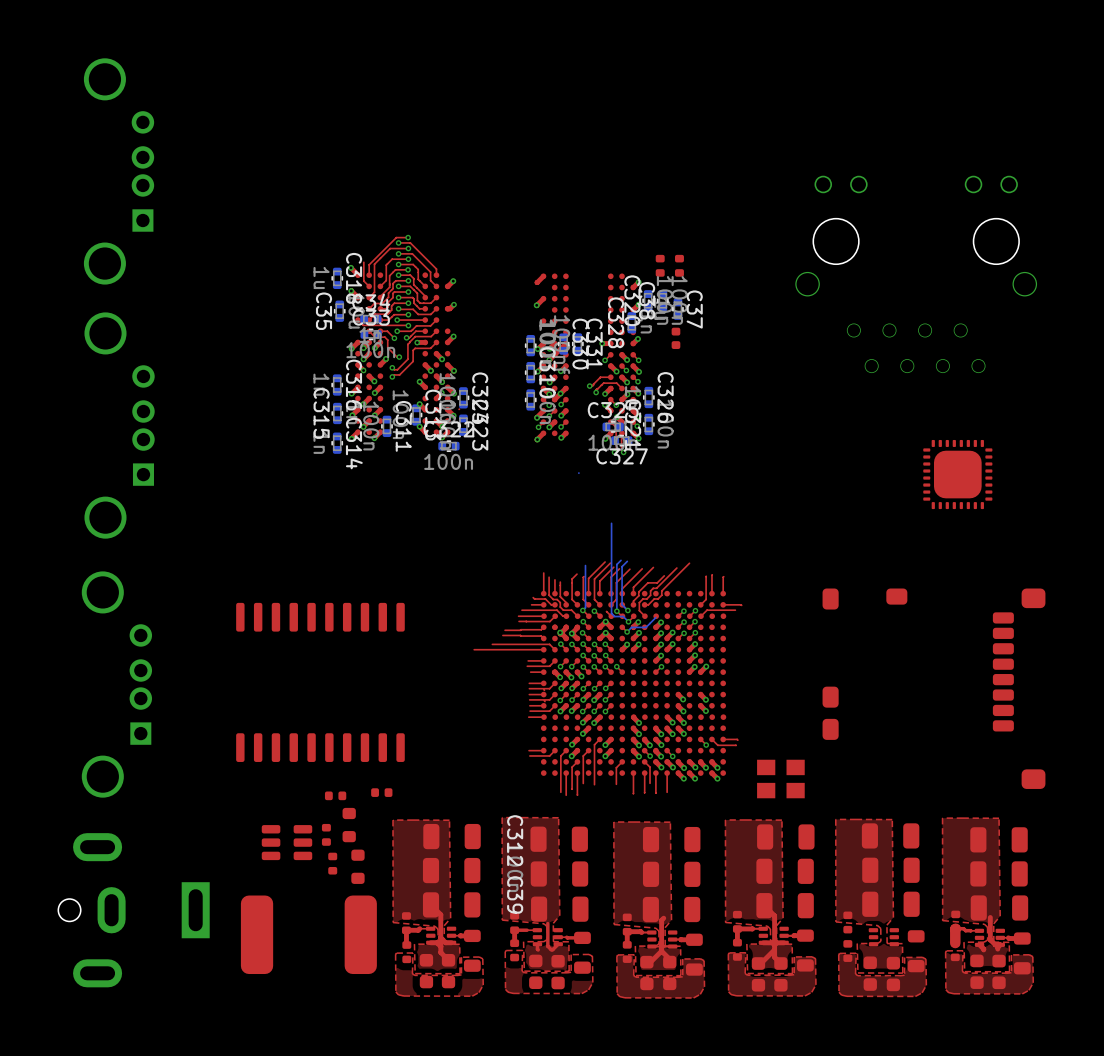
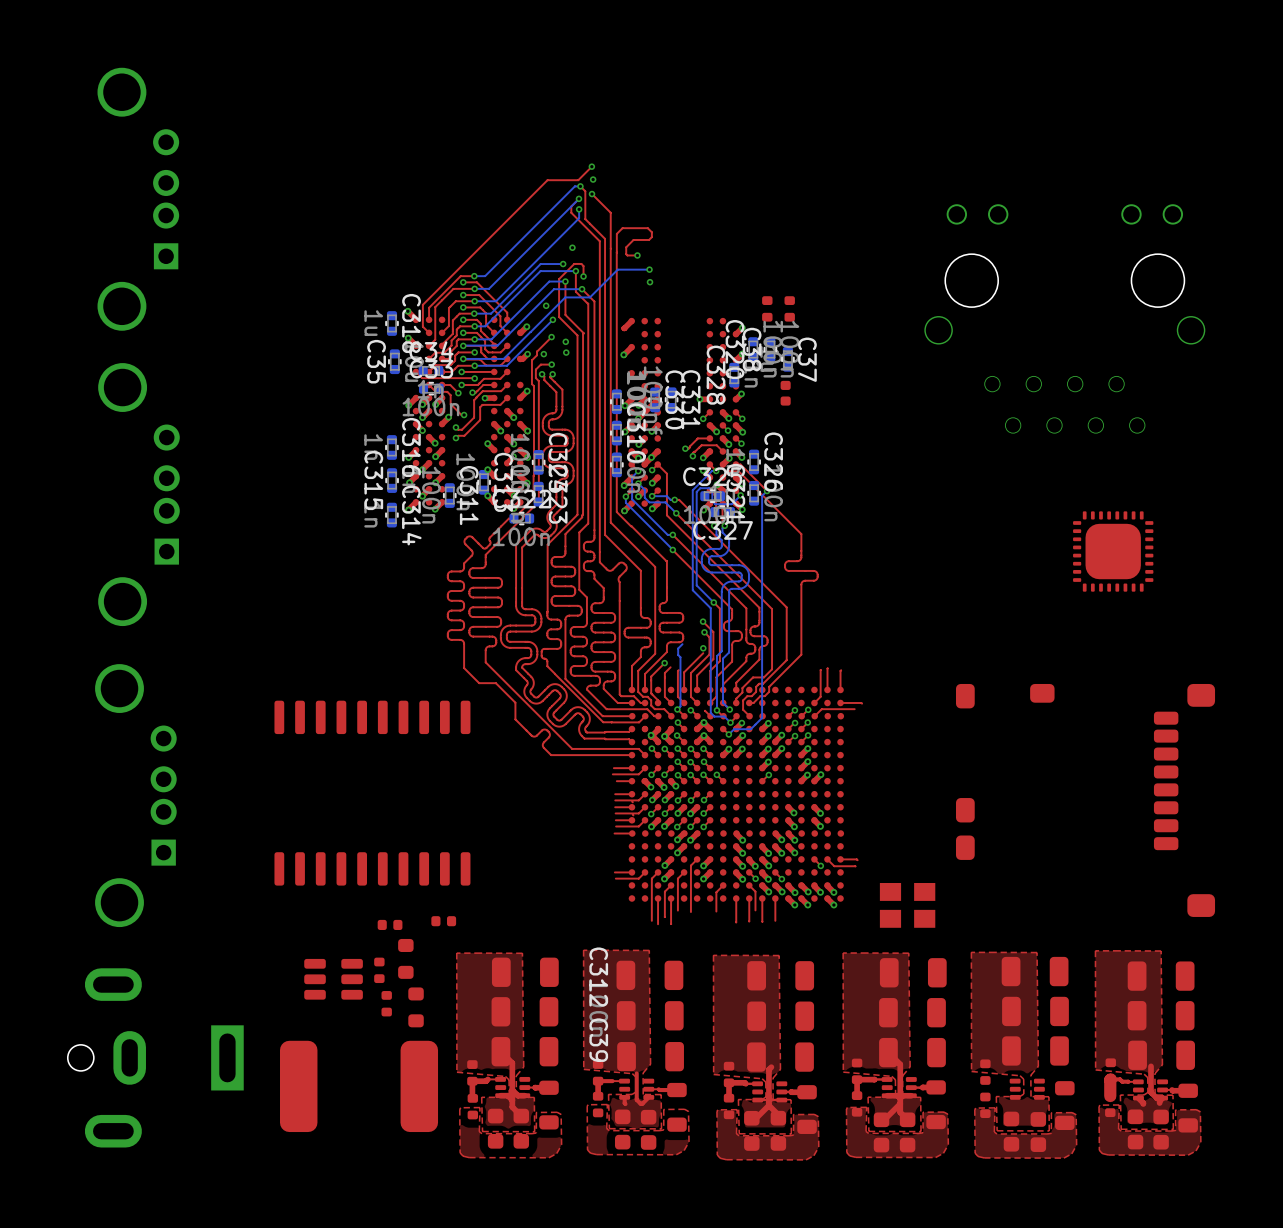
top track: none -> (591, 166) (578, 180) (547, 180) (422, 304)
via: none -> (591, 166)
via: none -> (593, 179)
top track: none -> (580, 186) (585, 191) (585, 219) (605, 238) (605, 534) (640, 570) (640, 614) (650, 621) (648, 627) (628, 627) (624, 629) (626, 637) (647, 637) (650, 640) (649, 645) (641, 648) (640, 657) (631, 666)
bottom track: none -> (580, 186) (574, 186) (485, 276) (474, 276)
via: none -> (580, 186)
top track: none -> (592, 194) (610, 212) (610, 522) (655, 566) (655, 653) (638, 670)
via: none -> (592, 194)
top track: none -> (578, 198) (571, 206) (571, 212) (599, 241) (599, 562) (609, 570) (621, 562) (626, 567) (618, 579) (619, 694)
bottom track: none -> (578, 198) (488, 288) (474, 288)
via: none -> (578, 198)
bottom track: none -> (579, 209) (579, 218) (496, 301) (474, 301)
via: none -> (579, 209)
via: none -> (572, 247)
top track: none -> (637, 255) (627, 255) (626, 247) (633, 239) (649, 239) (651, 237) (651, 232) (647, 228) (622, 228) (616, 233) (616, 512) (666, 561) (666, 599) (660, 604) (660, 611) (662, 612) (680, 613) (683, 616) (680, 622) (660, 624) (661, 631) (680, 632) (683, 639) (680, 642) (668, 643) (666, 652) (645, 673)
via: none -> (637, 255)
bottom track: none -> (563, 264) (540, 264) (491, 313) (474, 313)
via: none -> (563, 264)
bottom track: none -> (649, 269) (617, 269) (589, 297) (565, 297) (530, 331)
via: none -> (649, 269)
top track: none -> (575, 271) (575, 291) (588, 303) (588, 523) (579, 532) (579, 589) (586, 597) (586, 623) (584, 626) (572, 627) (570, 632) (573, 636) (585, 637) (586, 642) (584, 646) (572, 647) (570, 652) (573, 656) (585, 656) (586, 662) (584, 665) (572, 666) (570, 672) (574, 675) (598, 676) (598, 684) (589, 685) (586, 689) (606, 709)
bottom track: none -> (575, 271) (540, 271) (485, 326) (474, 326)
via: none -> (575, 271)
top track: none -> (583, 276) (583, 266) (581, 263) (574, 263) (559, 279) (559, 317) (577, 335) (577, 514) (547, 544) (547, 616) (549, 619) (559, 620) (561, 625) (558, 629) (548, 630) (547, 635) (549, 638) (559, 639) (561, 644) (558, 648) (542, 649) (541, 655) (547, 660) (547, 666) (603, 722)
via: none -> (583, 276)
top track: none -> (565, 281) (565, 314) (583, 333) (583, 514) (565, 534) (564, 555) (554, 557) (551, 560) (554, 566) (571, 566) (574, 568) (573, 575) (554, 576) (551, 582) (554, 586) (573, 586) (575, 593) (571, 596) (554, 596) (551, 602) (554, 605) (578, 605) (581, 608) (579, 615) (568, 615) (565, 618) (565, 678) (602, 716)
bottom track: none -> (565, 281) (549, 281) (491, 339) (474, 339)
via: none -> (565, 281)
via: none -> (650, 282)
top track: none -> (582, 289) (594, 301) (594, 537) (592, 540) (586, 542) (583, 545) (585, 550) (592, 552) (594, 557) (592, 560) (585, 562) (583, 567) (586, 570) (593, 572) (594, 578) (603, 588) (603, 600) (592, 604) (592, 611) (594, 612) (612, 613) (615, 616) (612, 622) (594, 622) (591, 624) (593, 632) (612, 632) (615, 636) (612, 642) (593, 642) (592, 650) (594, 652) (612, 652) (615, 657) (612, 661) (593, 662) (591, 668) (594, 671) (614, 673) (614, 679) (605, 682) (603, 688) (617, 702)
bottom track: none -> (582, 289) (554, 289) (497, 345) (463, 345)
via: none -> (582, 289)
via: none -> (546, 305)
bottom track: none -> (552, 319) (506, 365) (474, 365)
via: none -> (552, 319)
bottom track: none -> (530, 331) (503, 358) (463, 358)
top track: none -> (551, 337) (537, 351) (537, 355) (531, 360) (531, 384) (534, 386) (534, 475)
via: none -> (551, 337)
via: none -> (565, 341)
via: none -> (566, 352)
via: none -> (543, 354)
top track: none -> (551, 364) (540, 364) (535, 369) (535, 378) (538, 381) (538, 501) (485, 554) (484, 567) (469, 570) (469, 575) (472, 577) (498, 577) (501, 581) (498, 587) (471, 588) (469, 591) (470, 596) (498, 597) (501, 603) (498, 607) (470, 608) (469, 613) (471, 616) (498, 617) (501, 622) (497, 626) (472, 627) (469, 632) (472, 636) (495, 638) (495, 644) (485, 648) (485, 662) (572, 748)
via: none -> (551, 364)
top track: none -> (542, 374) (544, 380) (556, 392) (556, 410) (544, 417) (543, 429) (548, 434) (565, 435) (567, 438) (565, 445) (551, 446) (545, 448) (542, 454) (543, 461) (549, 467) (566, 468) (567, 476) (556, 484) (556, 504) (547, 516) (550, 527) (545, 531) (538, 528) (532, 529) (516, 544) (516, 608) (521, 614) (534, 616) (535, 623) (532, 625) (506, 626) (501, 631) (500, 639) (506, 647) (528, 647) (530, 649) (530, 656) (520, 659) (516, 666) (516, 670) (527, 682) (524, 690) (526, 697) (531, 702) (538, 703) (552, 690) (557, 690) (560, 696) (548, 710) (548, 719) (554, 725) (560, 726) (575, 713) (579, 713) (583, 718) (579, 730) (584, 738)
via: none -> (542, 374)
top track: none -> (552, 374) (550, 377) (562, 389) (562, 411) (558, 417) (549, 420) (549, 427) (551, 429) (569, 430) (573, 435) (573, 443) (571, 448) (567, 451) (550, 452) (548, 459) (551, 462) (570, 464) (573, 468) (573, 477) (570, 482) (562, 486) (562, 507) (553, 517) (556, 524) (554, 531) (545, 537) (535, 534) (522, 547) (522, 606) (524, 609) (534, 609) (538, 612) (541, 617) (540, 625) (533, 631) (509, 631) (506, 638) (509, 641) (529, 641) (535, 645) (537, 651) (536, 659) (522, 667) (533, 680) (530, 693) (537, 697) (550, 685) (560, 685) (565, 691) (566, 698) (553, 712) (553, 716) (560, 720) (572, 708) (582, 708) (589, 717) (585, 728) (587, 732)
via: none -> (552, 374)
top track: none -> (657, 464) (666, 473) (666, 515) (759, 607) (759, 623) (751, 627) (750, 632) (753, 636) (766, 637) (767, 643) (763, 646)
top track: none -> (735, 464) (740, 464) (767, 490)
bottom track: none -> (638, 471) (632, 477) (632, 499) (667, 534) (672, 534)
bottom track: none -> (716, 470) (712, 470) (692, 490) (692, 590) (710, 608)
top track: none -> (533, 475) (533, 498) (513, 518) (508, 518) (489, 537) (490, 543) (486, 547) (483, 548) (471, 536) (464, 539) (465, 543) (472, 551) (472, 554) (464, 563) (462, 570) (450, 571) (447, 575) (450, 580) (461, 581) (463, 583) (462, 590) (450, 591) (447, 594) (450, 600) (462, 601) (463, 608) (461, 610) (450, 610) (447, 616) (450, 620) (462, 620) (464, 627) (461, 630) (449, 630) (447, 636) (450, 639) (463, 641) (464, 668) (479, 683) (495, 683) (515, 702) (515, 719) (531, 735) (535, 736) (543, 729) (549, 732) (549, 736) (542, 745) (551, 755)
top track: none -> (722, 477) (729, 471) (738, 471) (801, 534) (800, 558) (798, 561) (787, 561) (785, 565) (788, 570) (814, 570) (817, 573) (815, 580) (804, 580) (801, 583) (801, 654)
bottom track: none -> (638, 483) (644, 489) (644, 497) (649, 502) (665, 502) (676, 513)
bottom track: none -> (767, 490) (762, 495) (762, 717)
via: none -> (767, 490)
bottom track: none -> (652, 496) (666, 496) (670, 499) (674, 499)
bottom track: none -> (740, 495) (731, 504) (715, 504) (712, 501) (712, 491) (709, 488) (700, 488) (696, 491) (696, 585) (713, 602)
bottom track: none -> (625, 496) (625, 502) (672, 549)
top track: none -> (674, 499) (679, 499) (786, 607) (786, 660)
via: none -> (674, 499)
top track: none -> (676, 513) (772, 609) (772, 669)
via: none -> (676, 513)
bottom track: none -> (714, 525) (716, 528) (716, 534) (721, 540) (721, 546) (719, 548) (708, 549) (704, 552) (701, 559) (703, 567) (709, 572) (739, 572) (741, 575) (740, 580) (727, 582) (722, 589) (721, 651)
bottom track: none -> (724, 525) (722, 532) (729, 539) (728, 549) (722, 555) (710, 556) (709, 563) (742, 565) (746, 569) (749, 575) (748, 582) (745, 586) (729, 591) (729, 652)
top track: none -> (672, 534) (746, 608) (746, 640) (755, 647) (754, 652) (746, 655) (746, 661)
via: none -> (672, 534)
top track: none -> (672, 550) (732, 609) (731, 618) (728, 621)
via: none -> (672, 549)
top track: none -> (713, 602) (719, 608) (719, 661)
via: none -> (713, 602)
top track: none -> (703, 621) (713, 631) (713, 659)
via: none -> (703, 621)
top track: none -> (727, 621) (724, 623) (725, 630) (738, 631) (741, 634) (740, 639) (732, 643) (732, 661)
top track: none -> (704, 632) (709, 637) (709, 654)
via: none -> (704, 632)
bottom track: none -> (682, 644) (678, 648) (678, 654) (680, 657)
top track: none -> (763, 646) (759, 648) (759, 659)
via: none -> (703, 648)
top track: none -> (664, 663) (651, 676)
via: none -> (664, 663)

